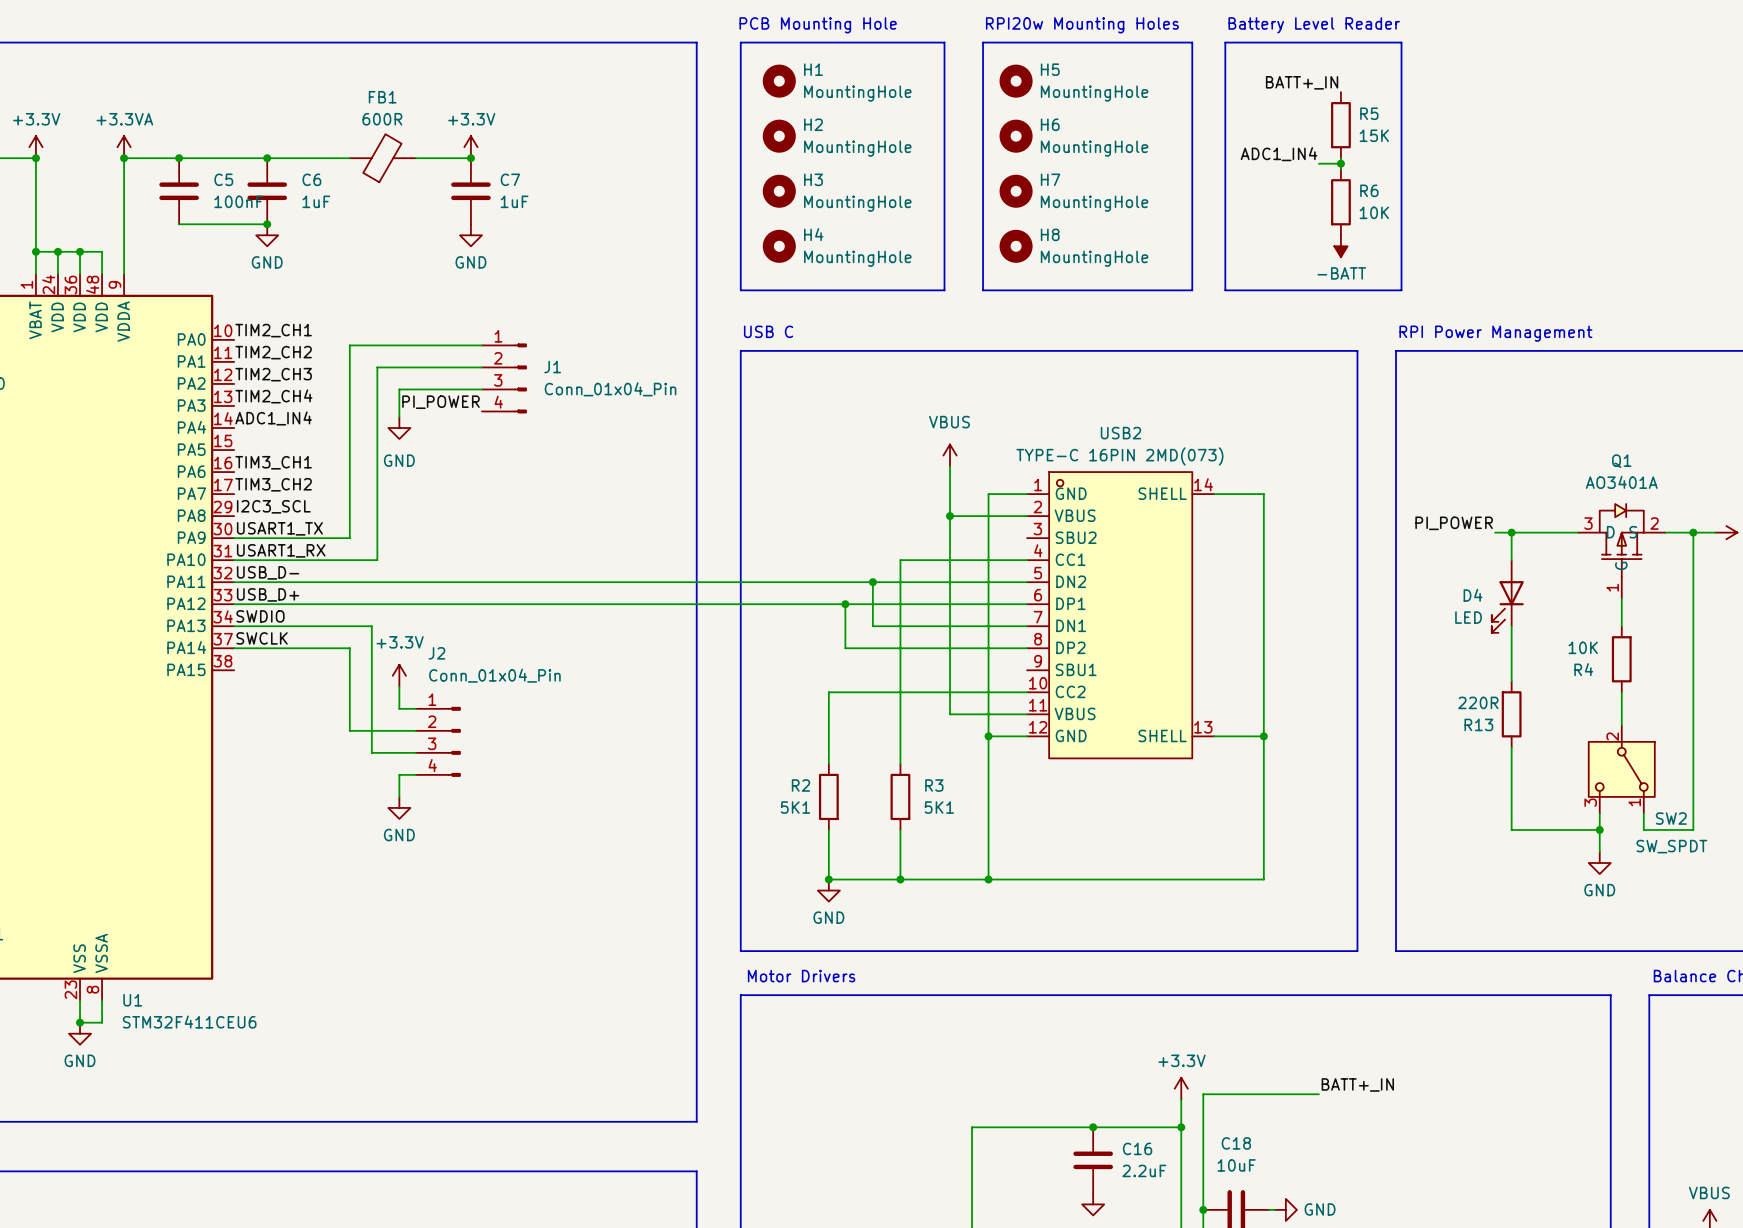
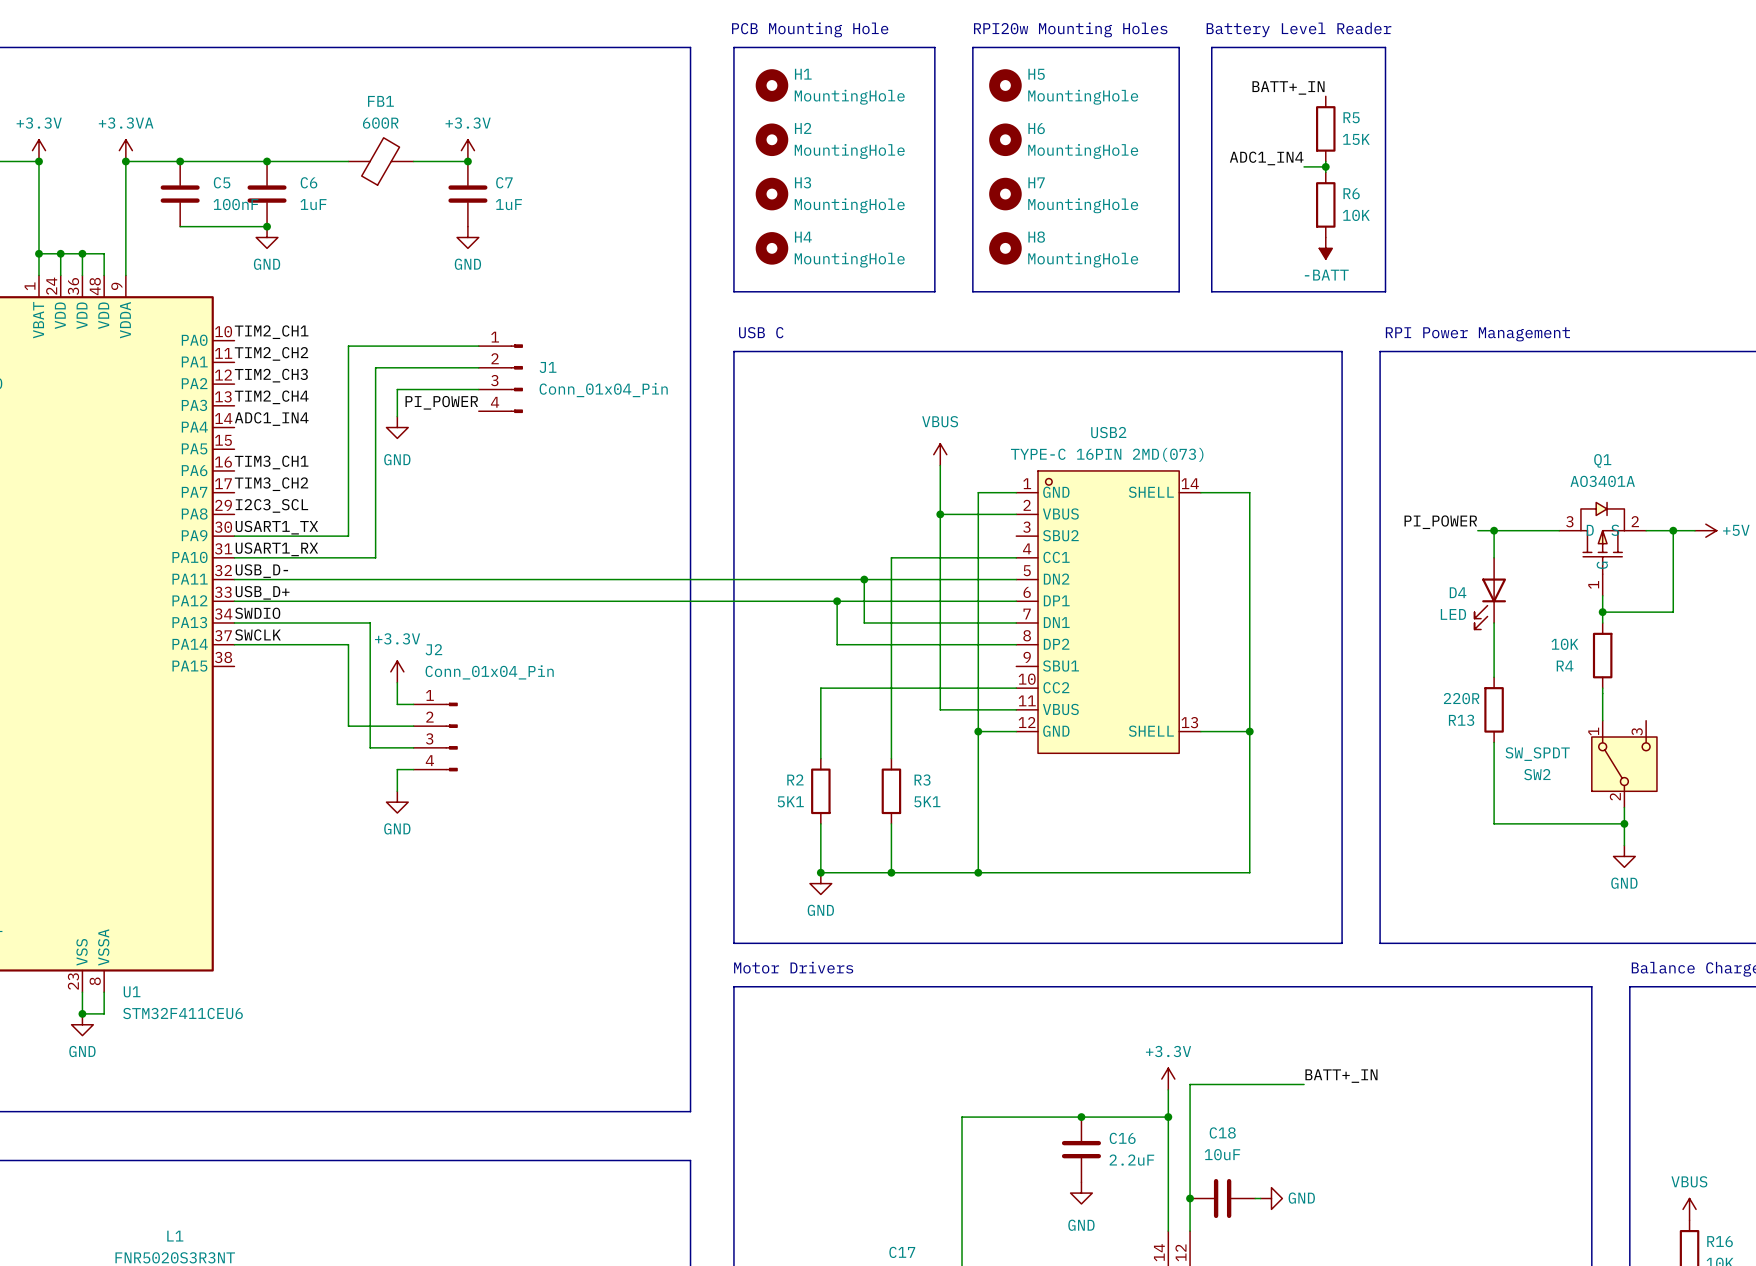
junction: none -> (1602, 612)
wire: (1693, 615) (1693, 829) (1643, 829) -> (1673, 612) (1602, 612)
SW2 rotation: 0° (1621, 769) -> 180° (1624, 764)
wire: (1599, 813) (1599, 851) -> none
SW2 name position: SW2 (1671, 818) -> SW2 (1537, 774)
wire: none -> (1580, 823) (1624, 823) (1624, 845)
junction position: (1599, 829) -> (1624, 823)
SW2 value position: SW_SPDT (1671, 846) -> SW_SPDT (1537, 754)
power symbol position: GND (1599, 863) -> GND (1624, 856)

